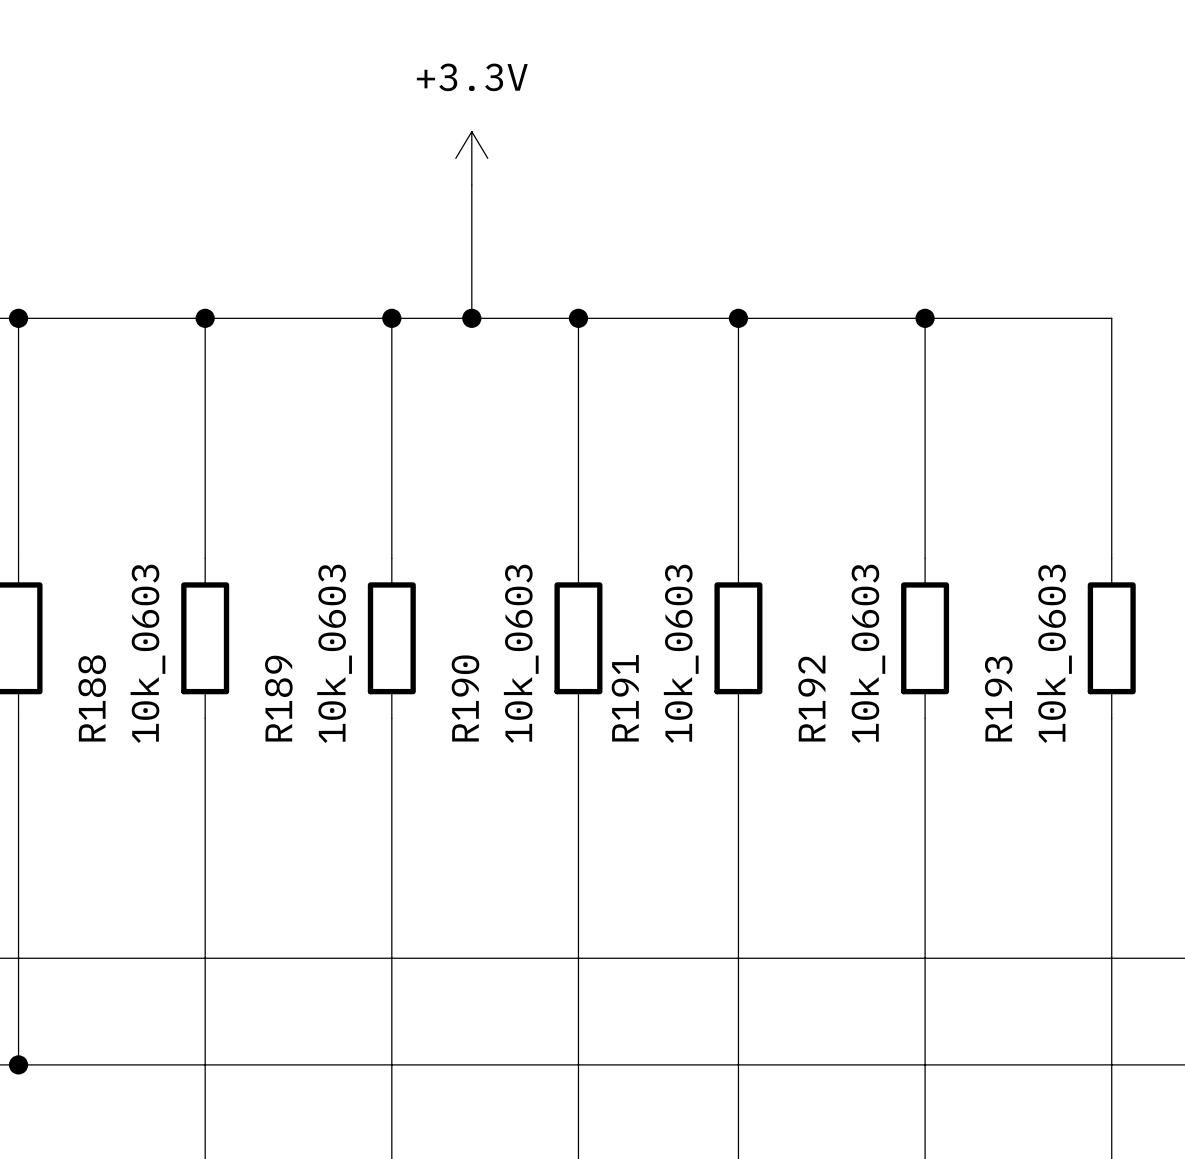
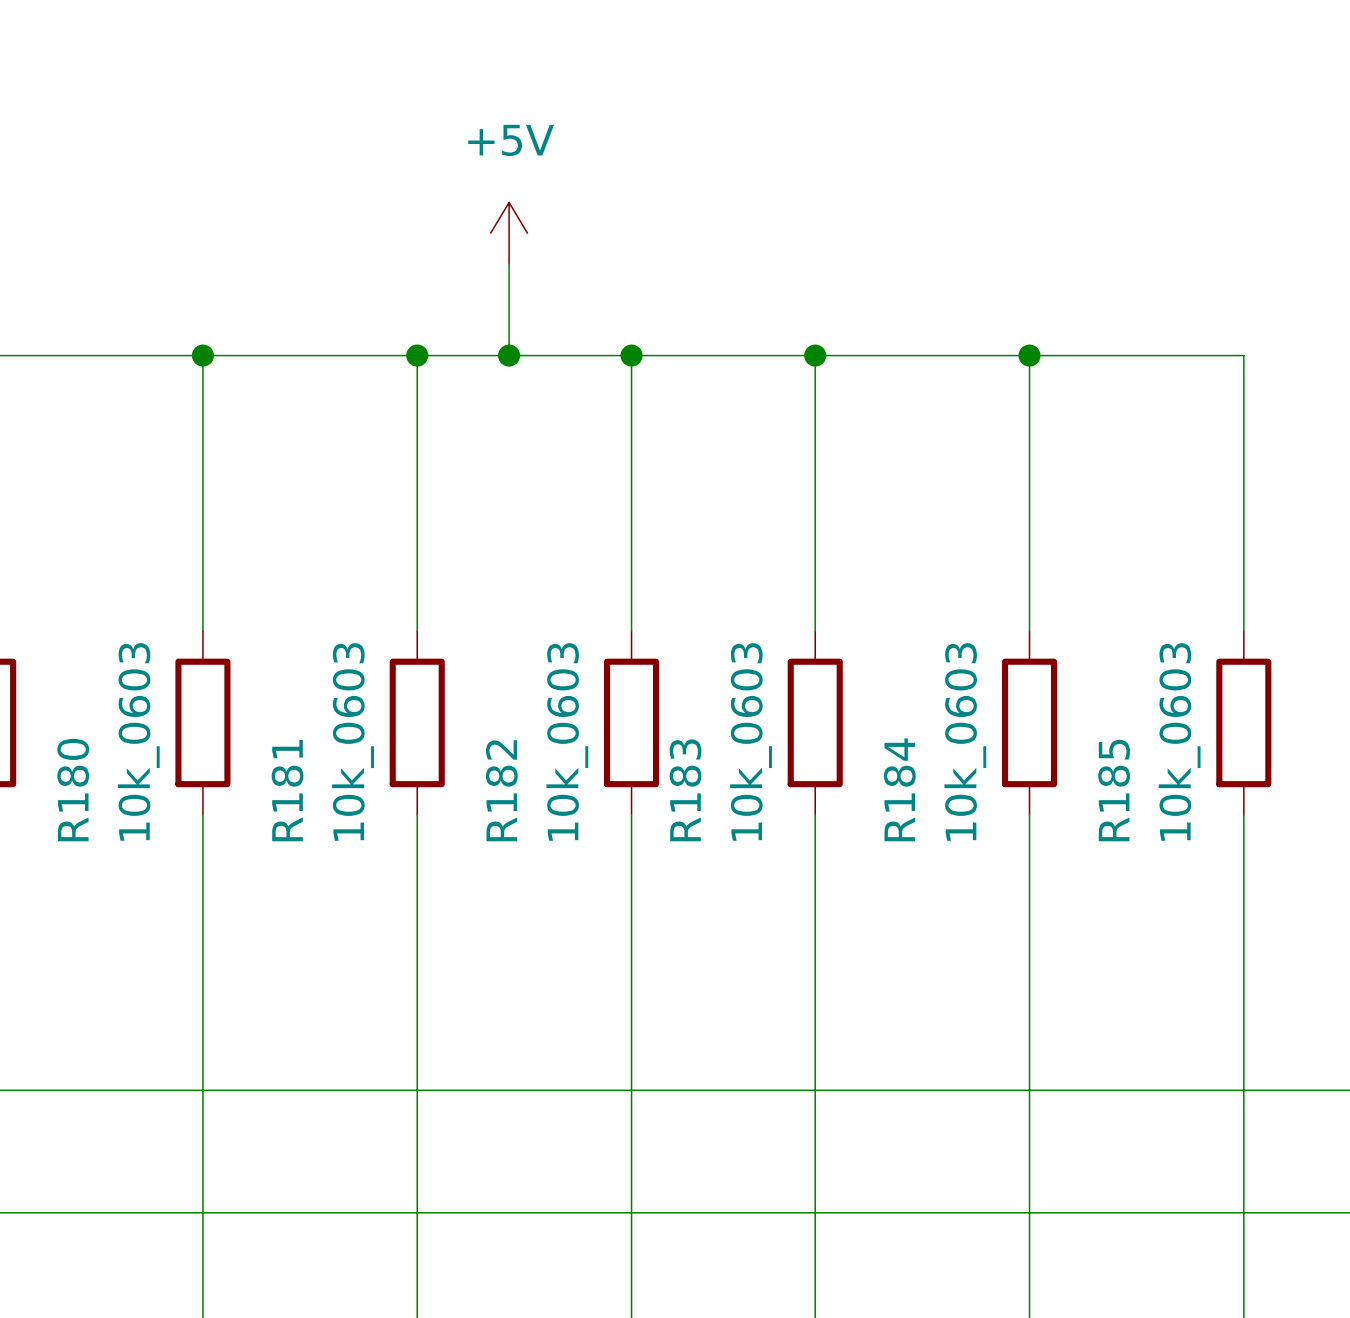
power symbol: +3.3V (471, 158) -> none
power symbol: none -> +5V (509, 233)
R188 name: R188 (92, 698) -> R180 (73, 790)
R189 name: R189 (278, 698) -> R181 (287, 790)
R190 name: R190 (465, 698) -> R182 (501, 790)
R191 name: R191 (625, 698) -> R183 (685, 790)
R192 name: R192 (811, 698) -> R184 (899, 789)
R193 name: R193 (998, 698) -> R185 (1114, 790)

